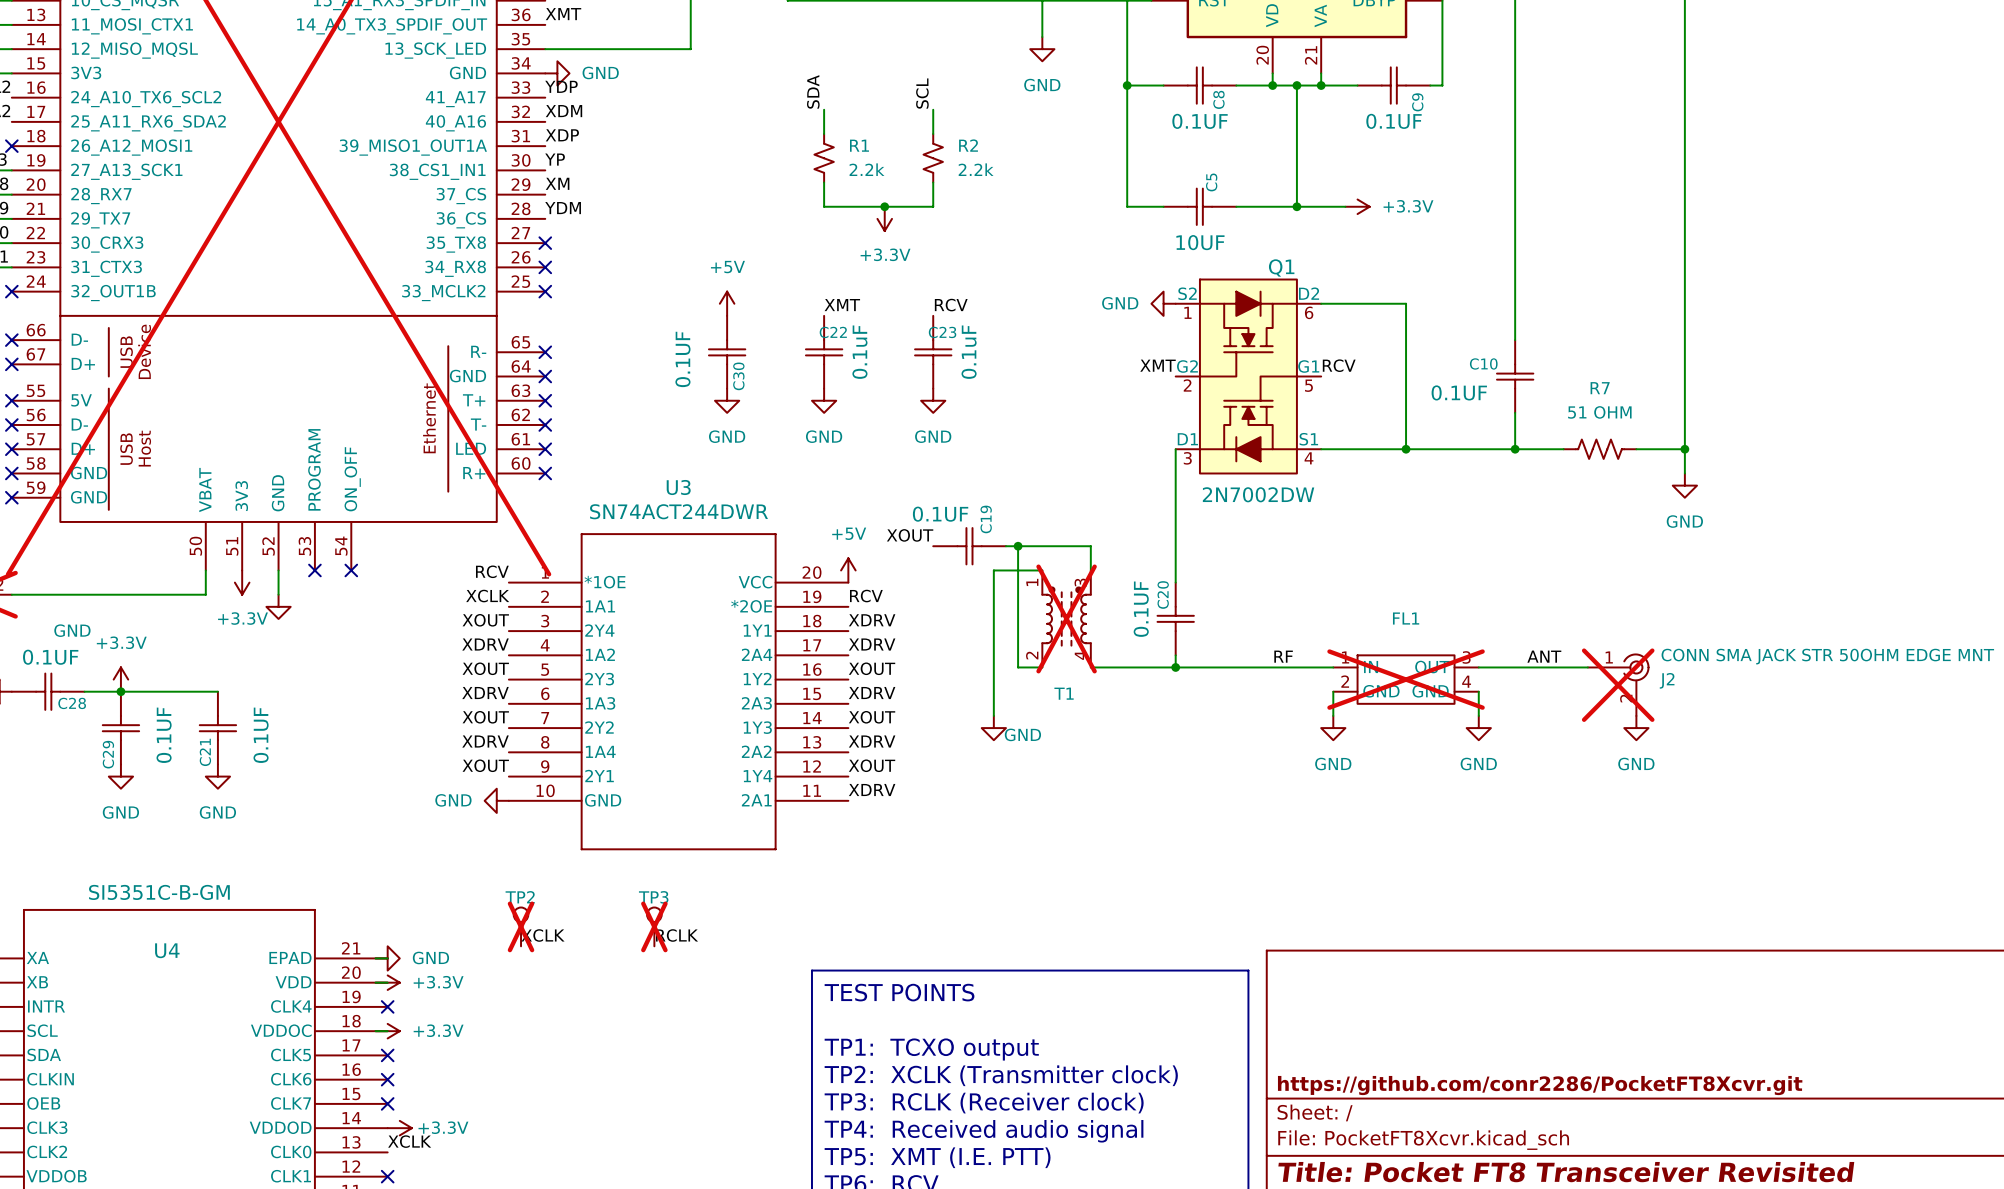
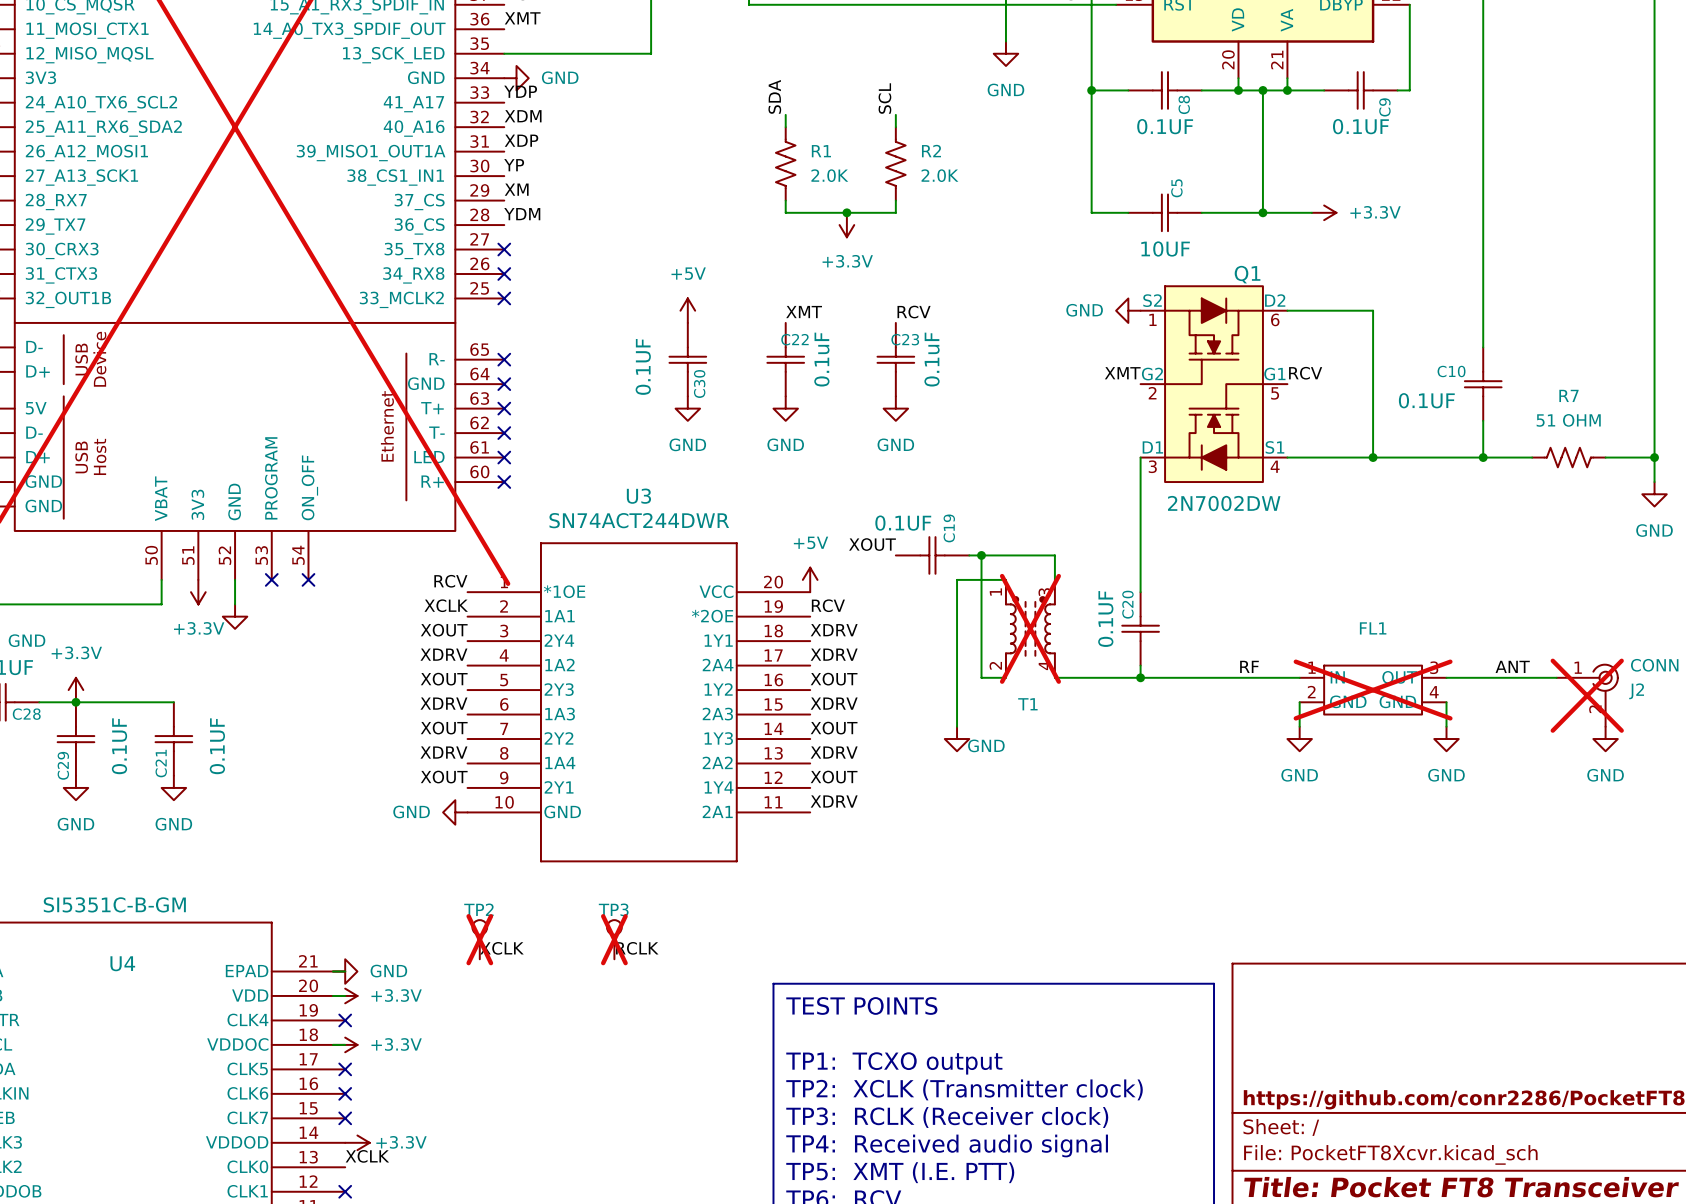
R1 symbol: [814, 134, 834, 183] -> [775, 127, 796, 201]
R2 symbol: [923, 134, 943, 183] -> [886, 127, 906, 201]
R1 value: 2.2k (866, 169) -> 2.0K (829, 175)
R2 value: 2.2k (976, 169) -> 2.0K (939, 175)

